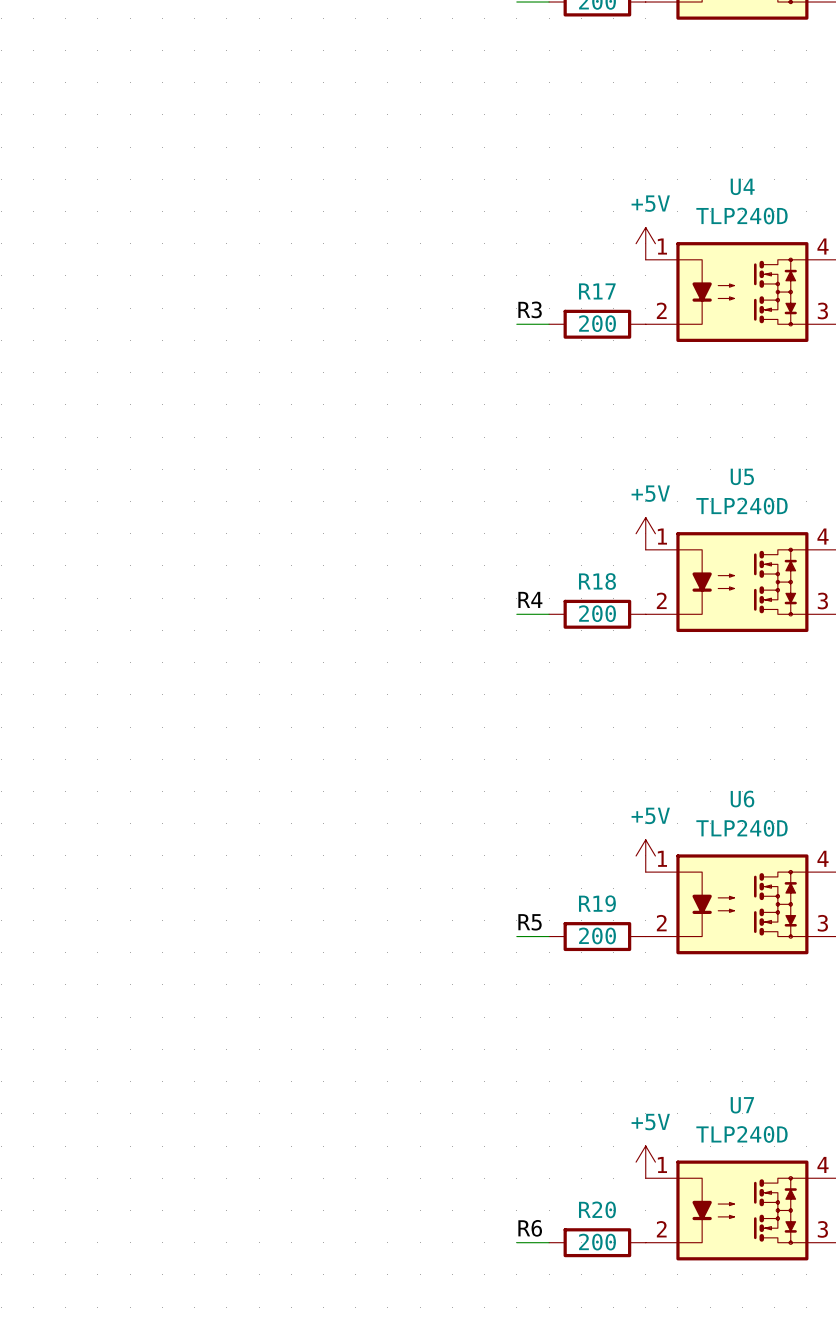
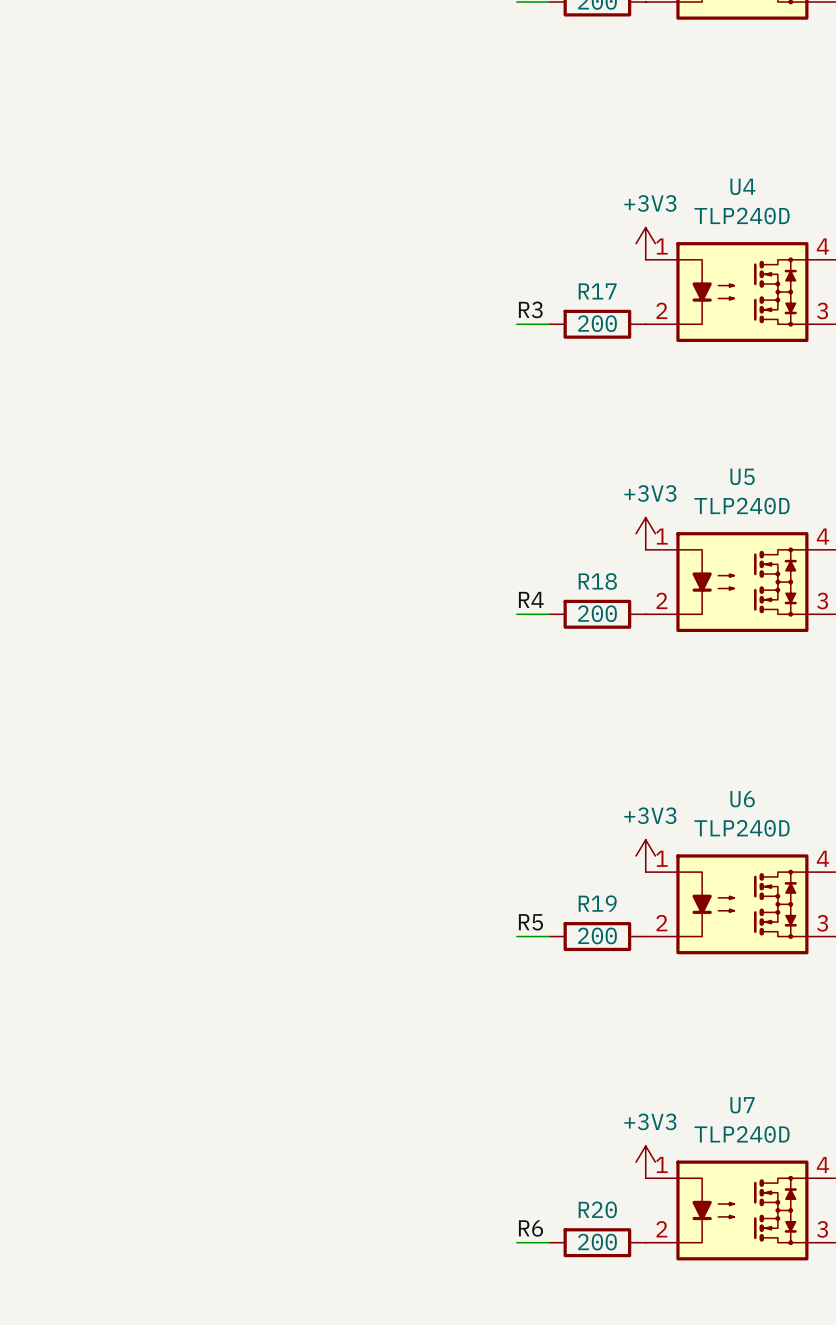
power symbol: +5V (645, 243) -> +3V3 (645, 243)
power symbol: +5V (645, 533) -> +3V3 (645, 533)
power symbol: +5V (645, 855) -> +3V3 (645, 855)
power symbol: +5V (645, 1162) -> +3V3 (645, 1162)

